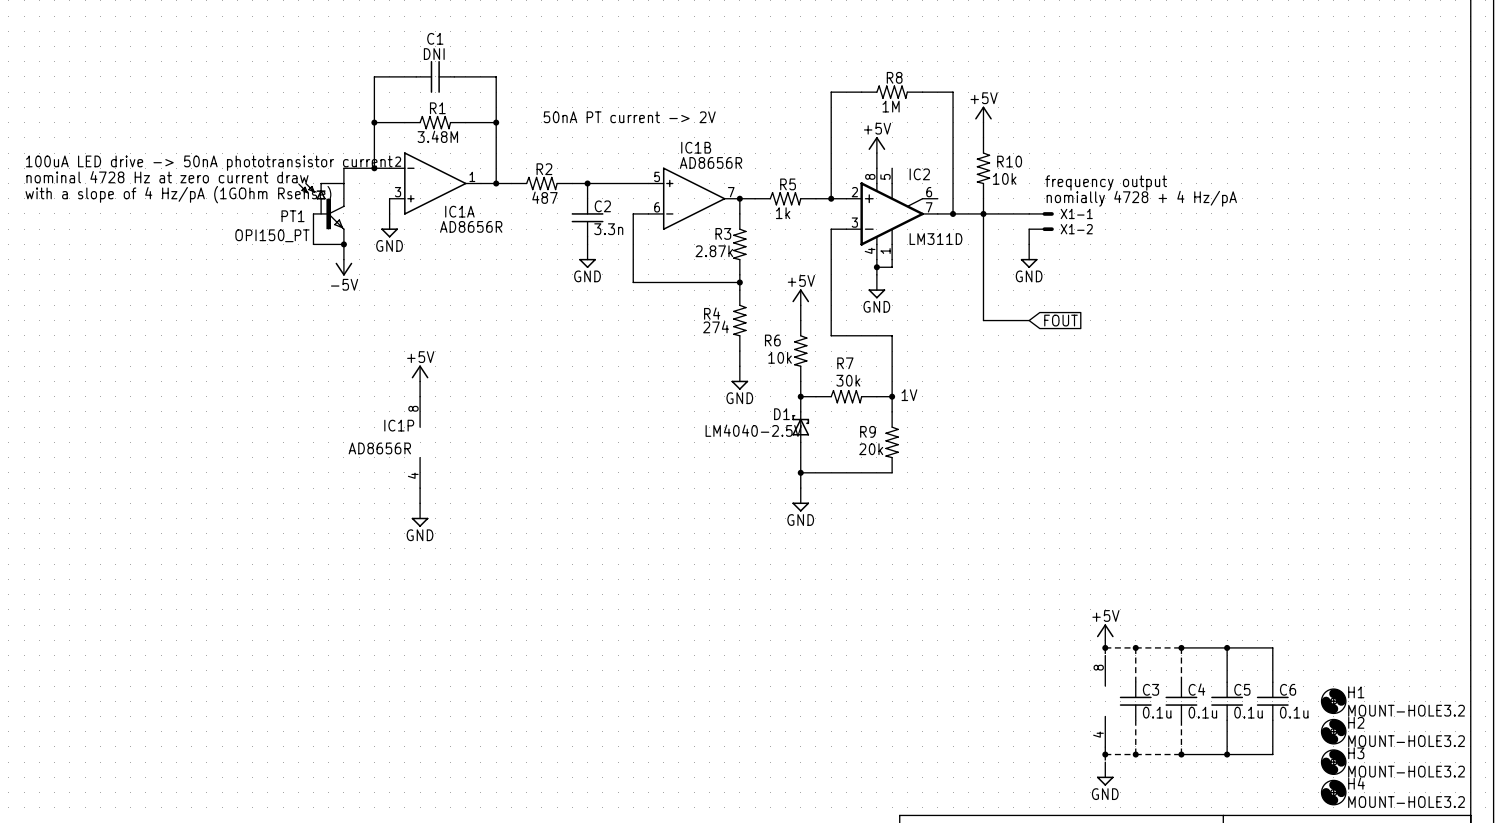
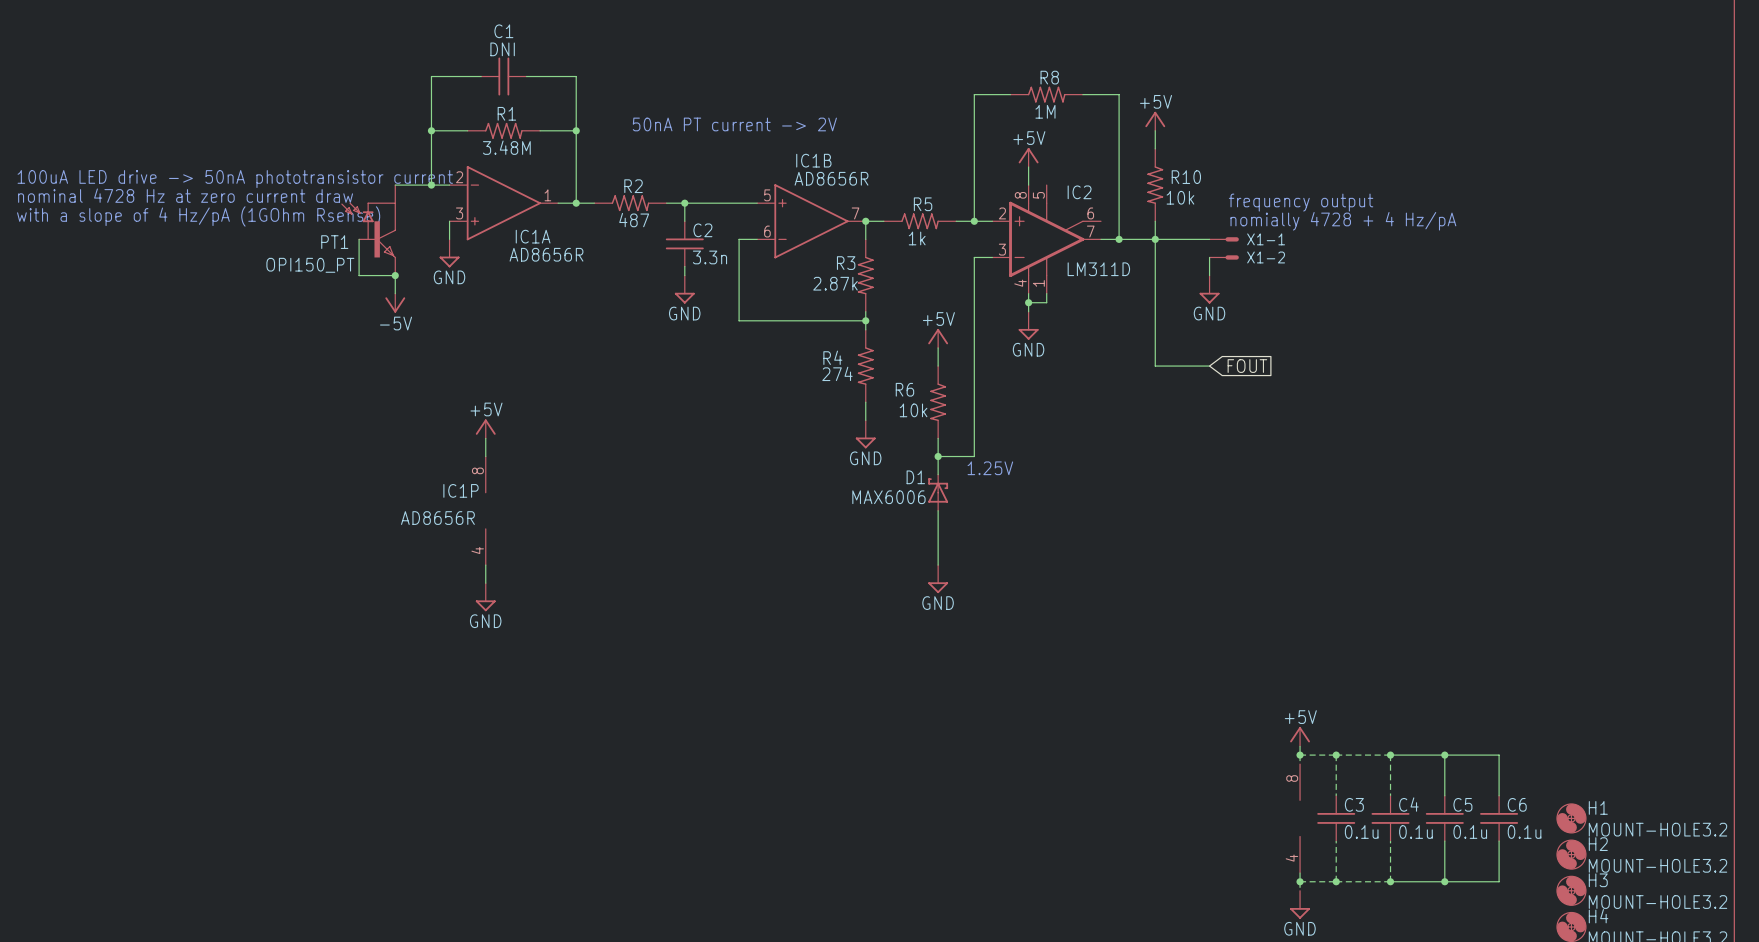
wire: (831, 335) (892, 335) (892, 411) -> (974, 384) (974, 456) (956, 456)
text: 1V (909, 395) -> none
R7: 30k (846, 396) -> none
wire: (876, 396) (892, 396) -> none
junction: (892, 396) -> none
text: none -> 1.25V (990, 468)
D1 value: LM4040-2.5V (753, 430) -> MAX6006 (888, 497)
R9: 20k (892, 442) -> none
wire: (800, 472) (892, 472) -> none
junction: (800, 472) -> none

